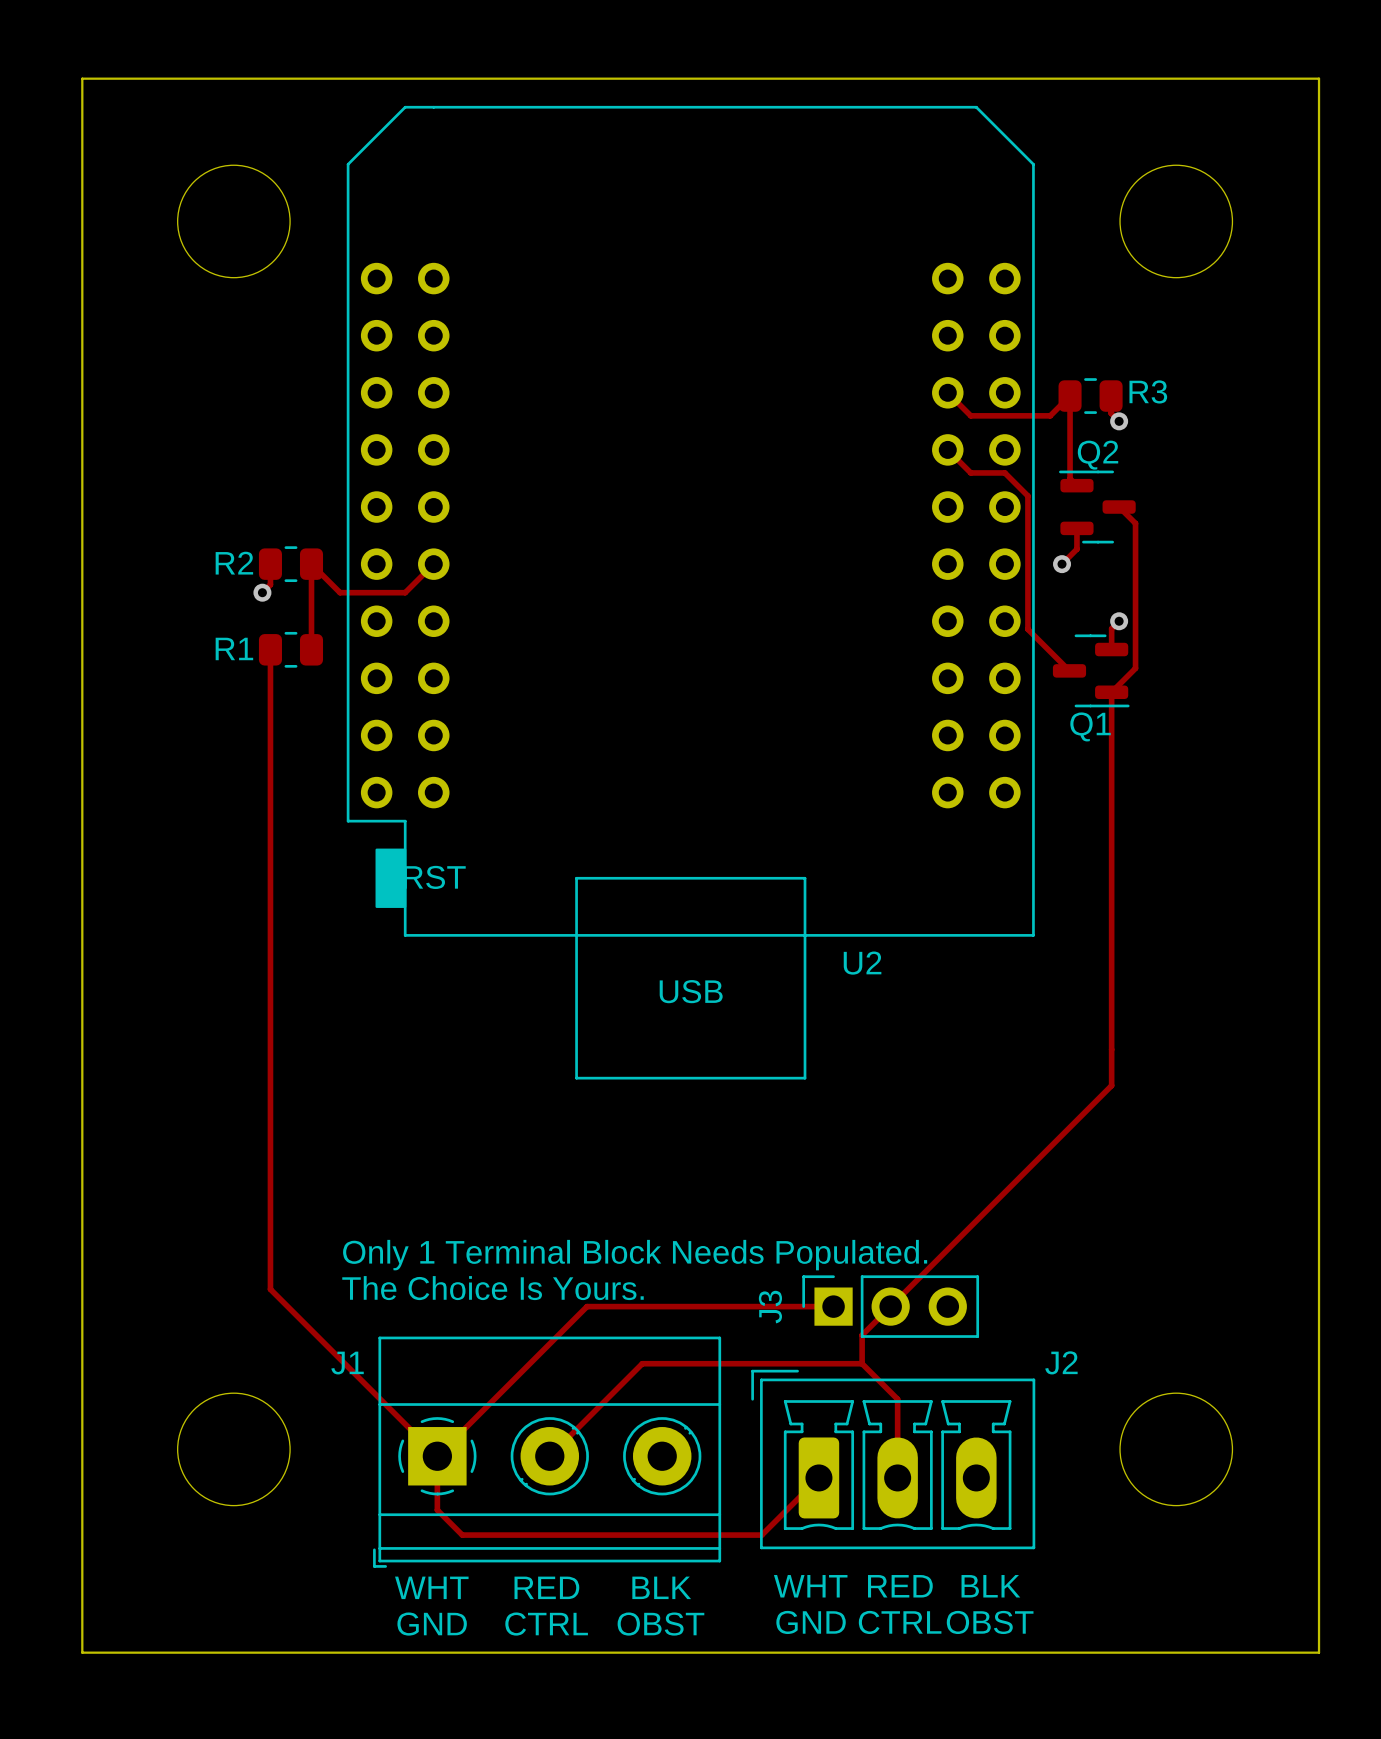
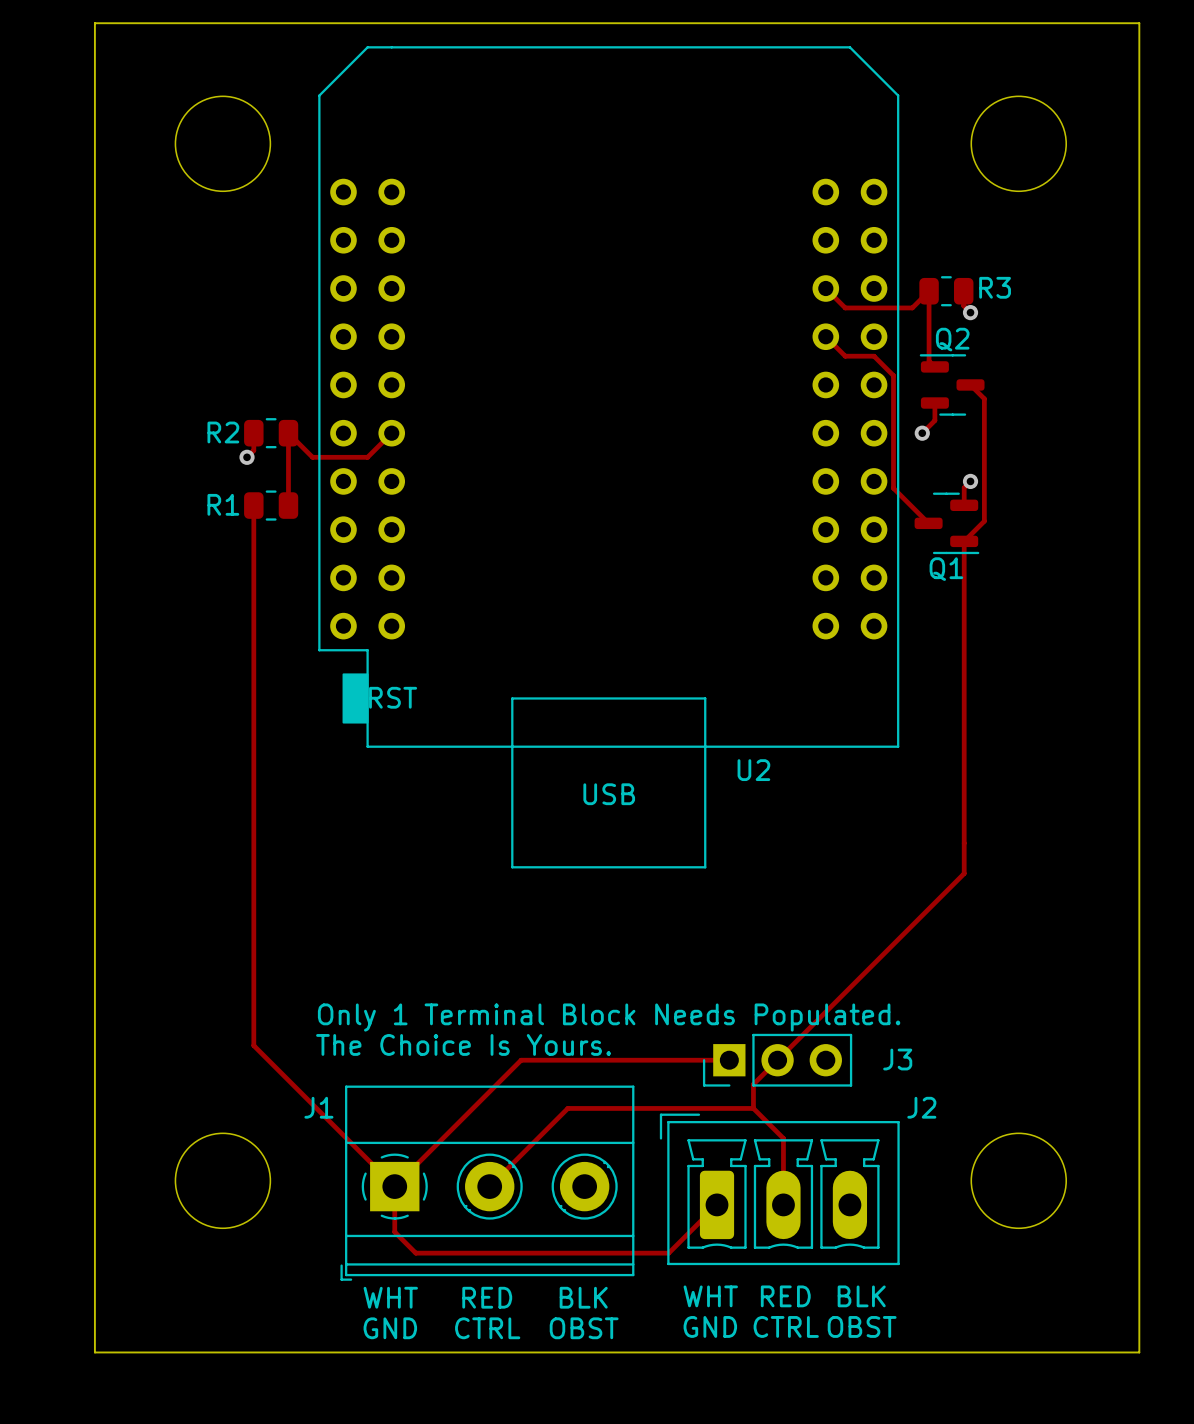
J3 footprint: [802, 1275, 980, 1338] -> [702, 1033, 853, 1087]
J3 name position: J3 (770, 1307) -> J3 (897, 1059)

